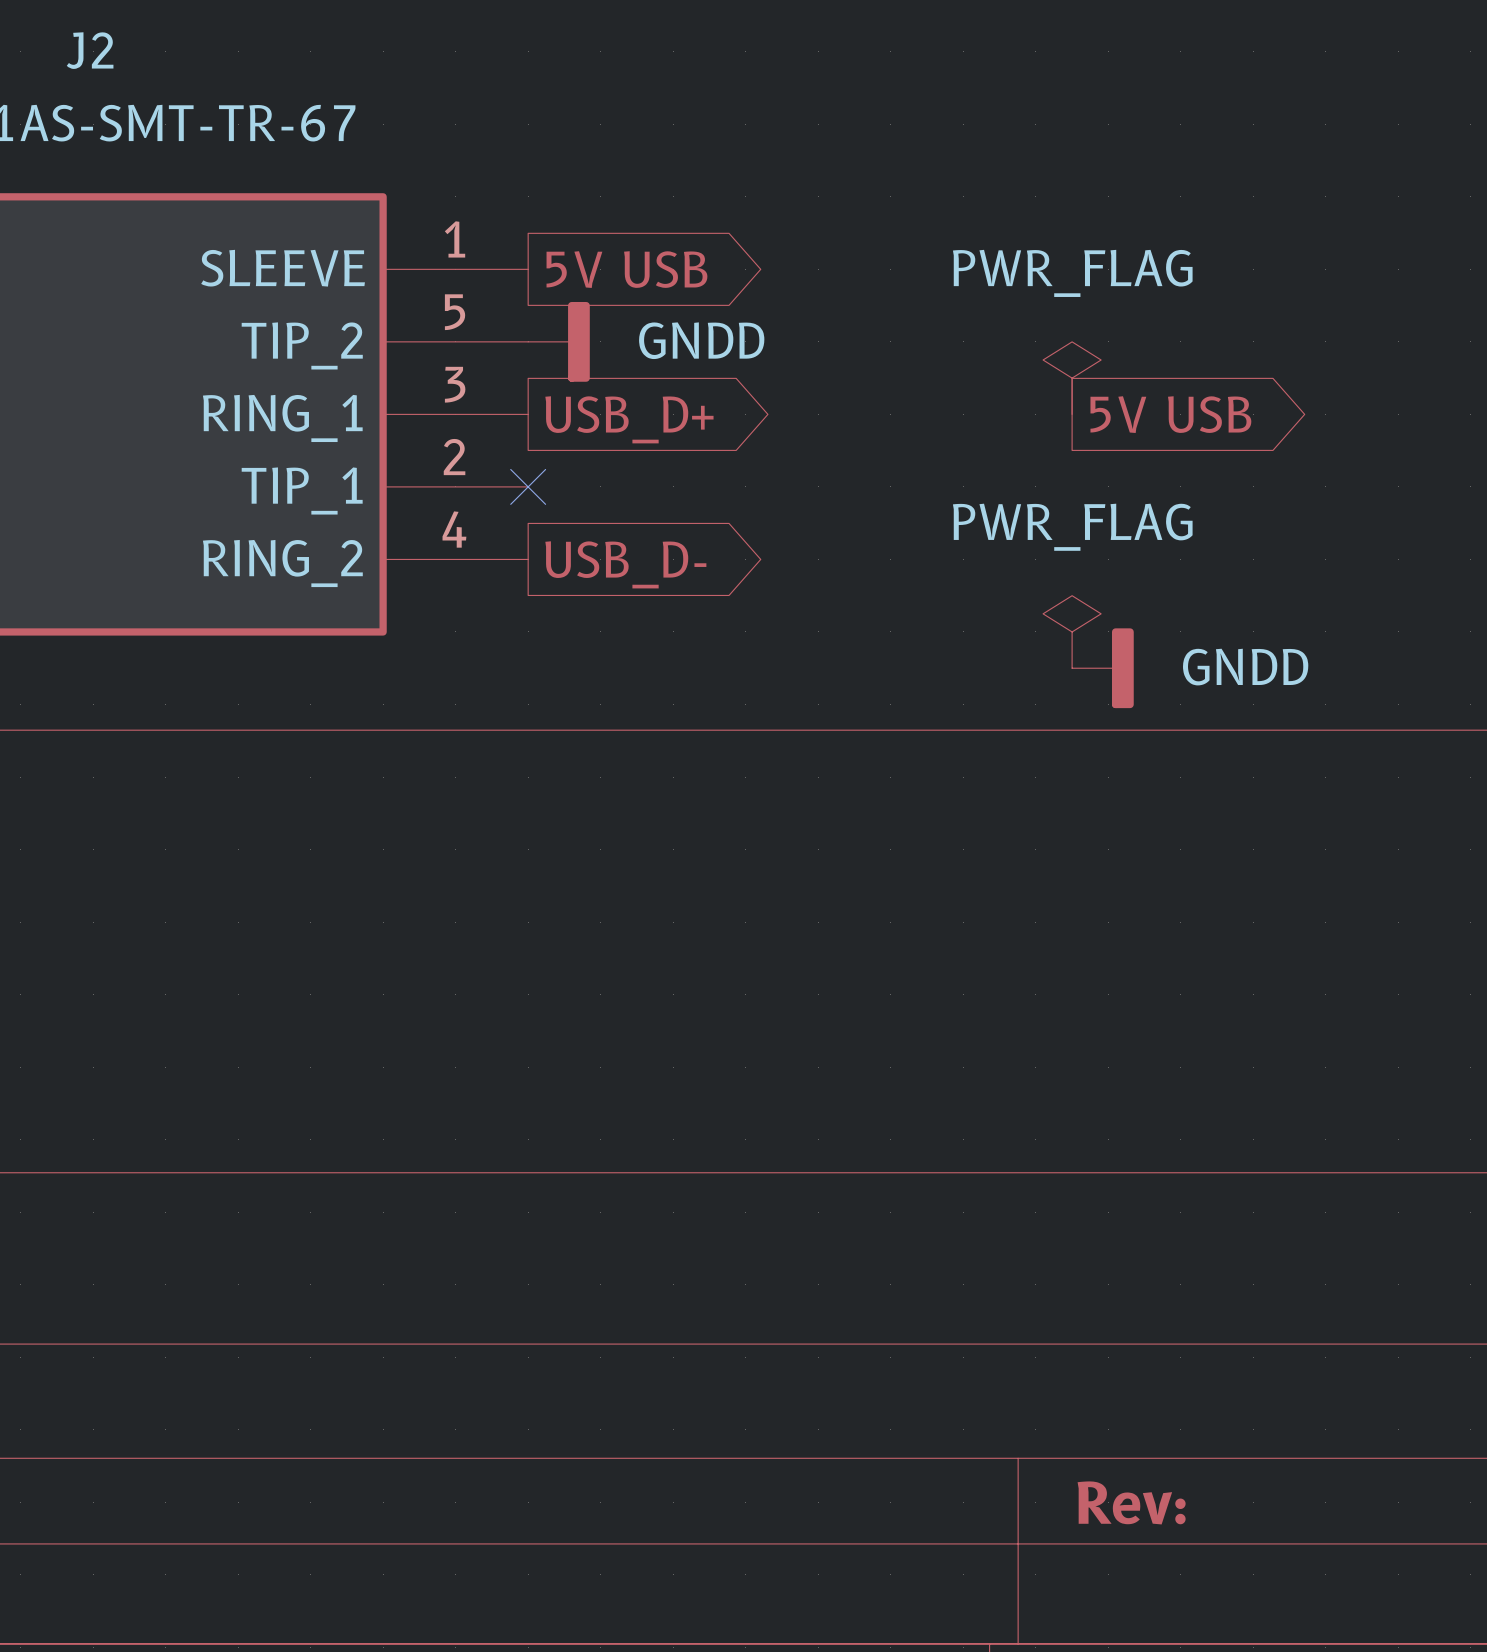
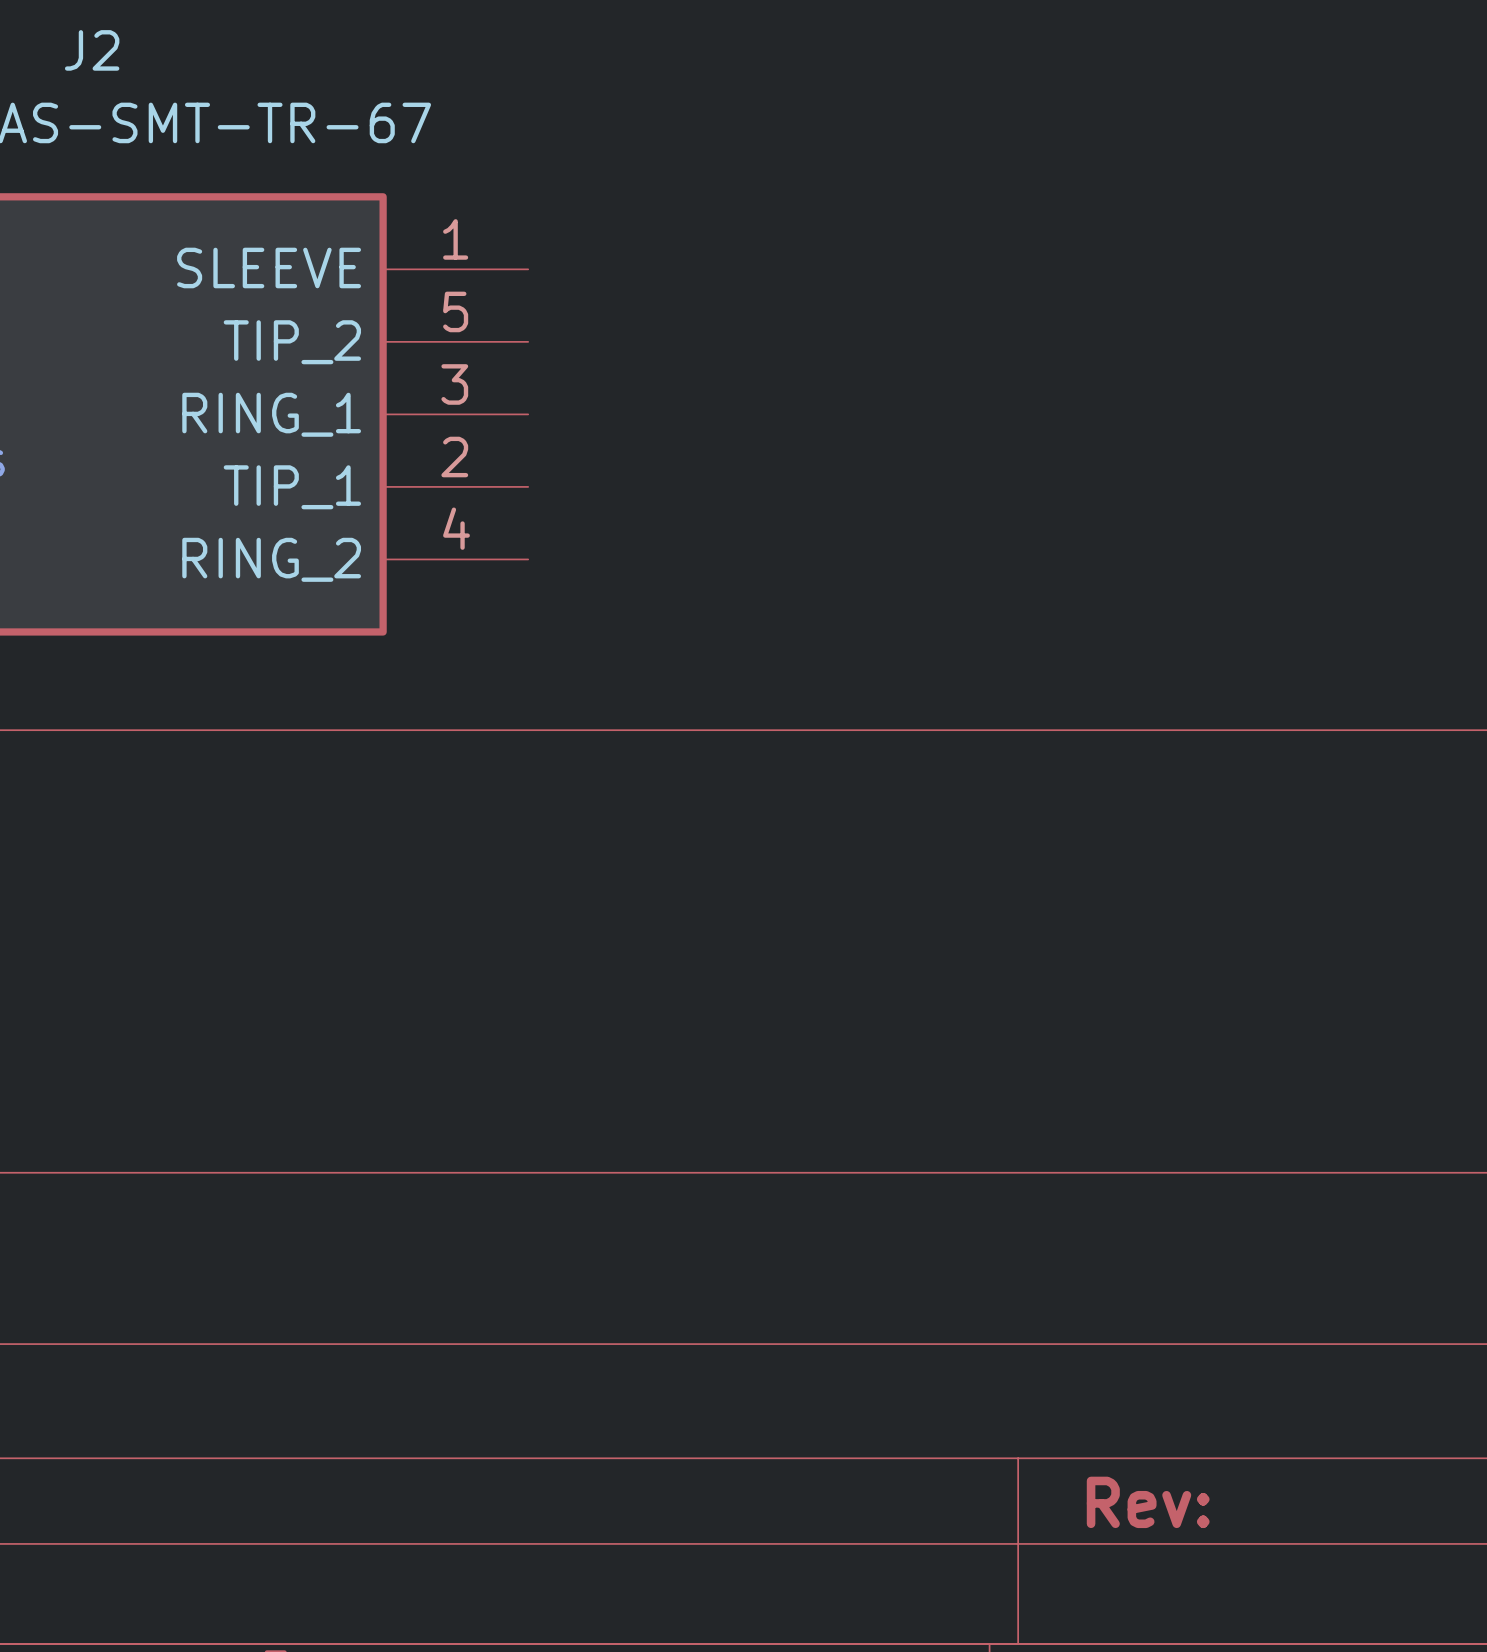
global label: 5V USB (626, 269) -> none
power symbol: GNDD (558, 341) -> none
power symbol: PWR_FLAG (1072, 378) -> none
global label: 5V USB (1170, 414) -> none
global label: USB_D+ (629, 419) -> none
no-connect mark: (528, 486) -> none
global label: USB_D- (625, 564) -> none
power symbol: PWR_FLAG (1072, 631) -> none
power symbol: GNDD (1102, 668) -> none

